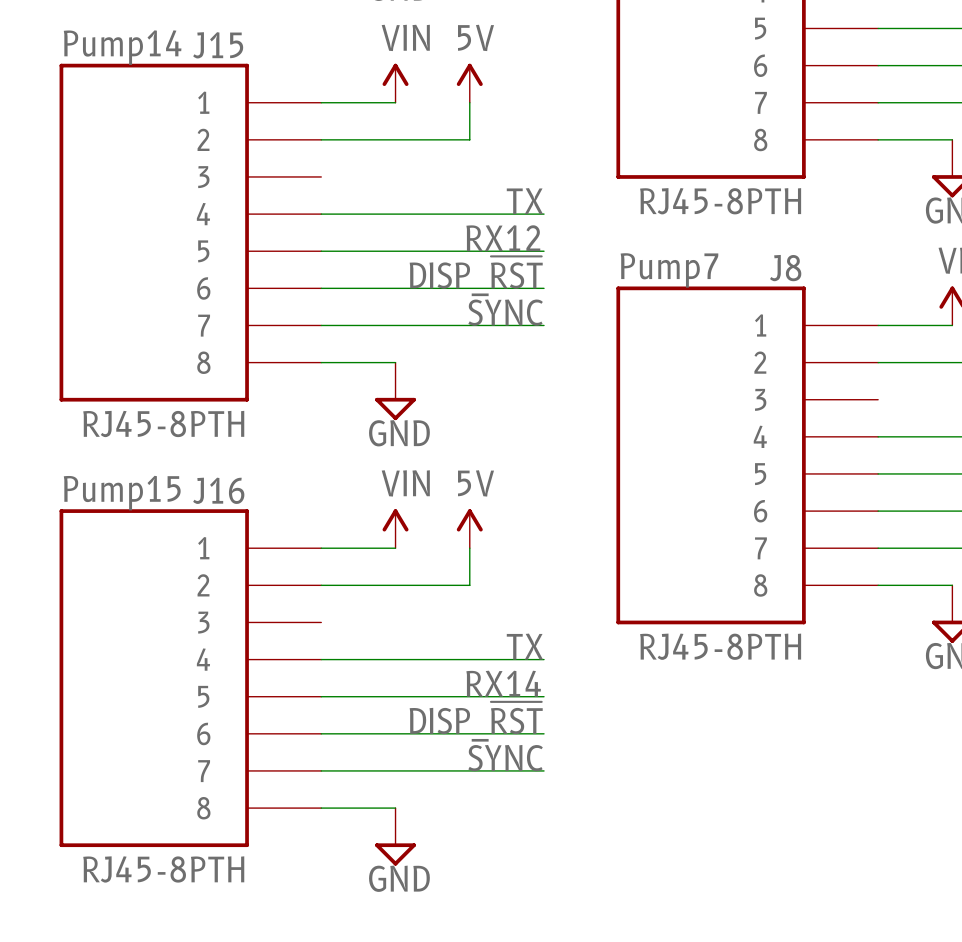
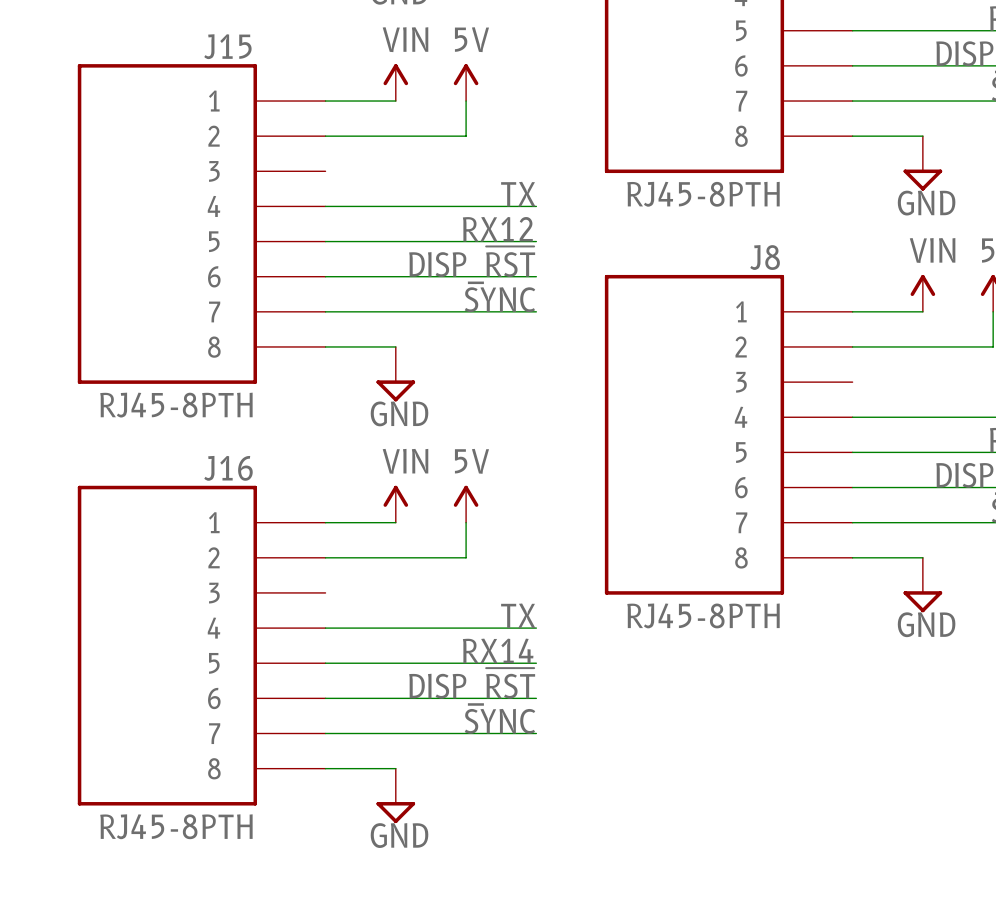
text: Pump14 (122, 47) -> none
text: Pump7 (669, 270) -> none
text: Pump15 (122, 493) -> none

